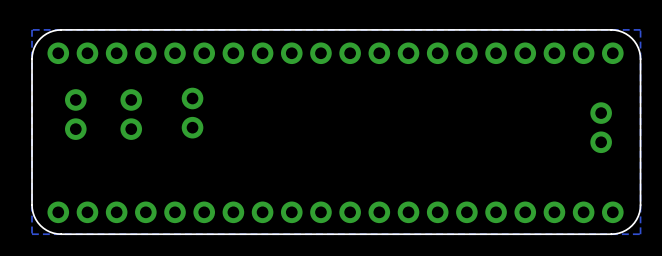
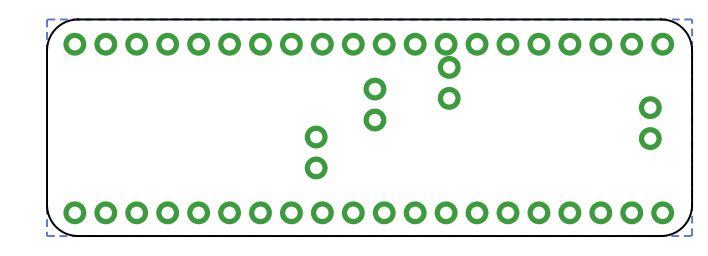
part: none -> (449, 82)
part: none -> (374, 104)
part: (192, 113) -> none
part: (75, 114) -> none
part: (131, 114) -> none
part: none -> (316, 152)

